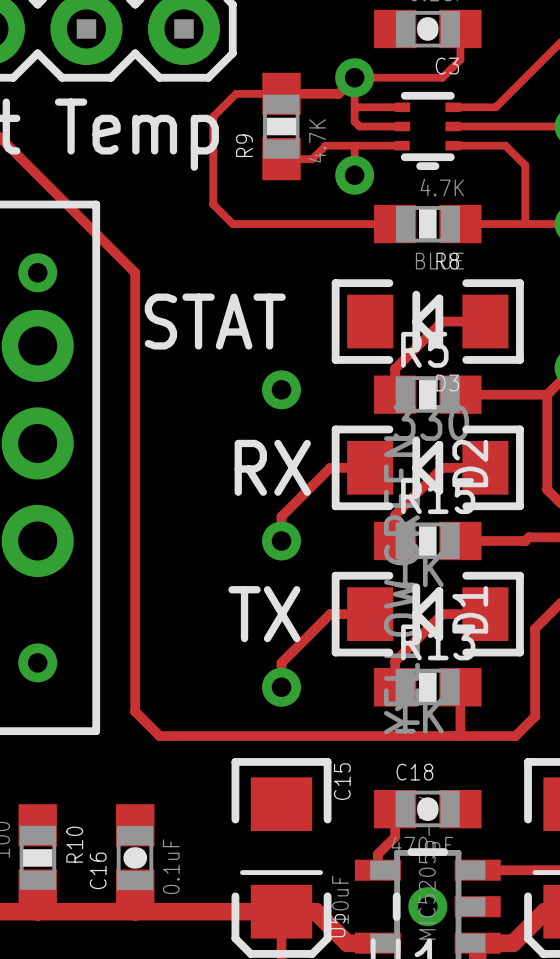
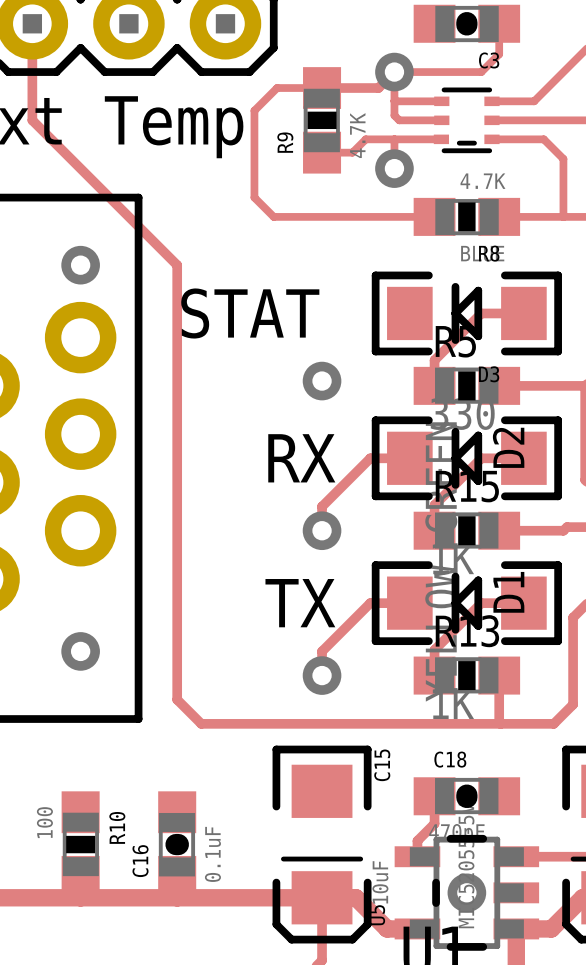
part footprint: [394, 91, 461, 171] -> [433, 87, 500, 154]

